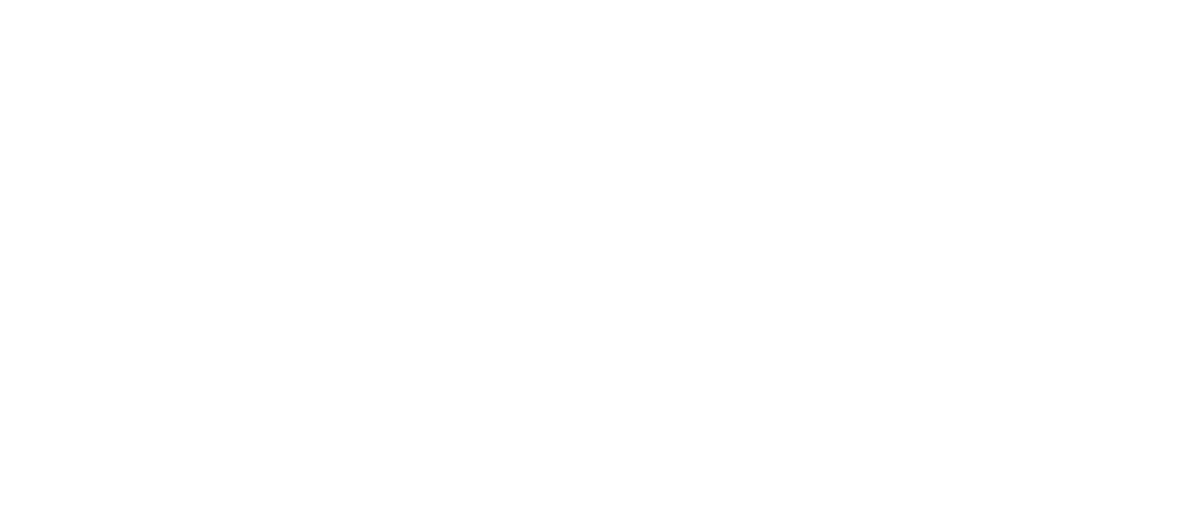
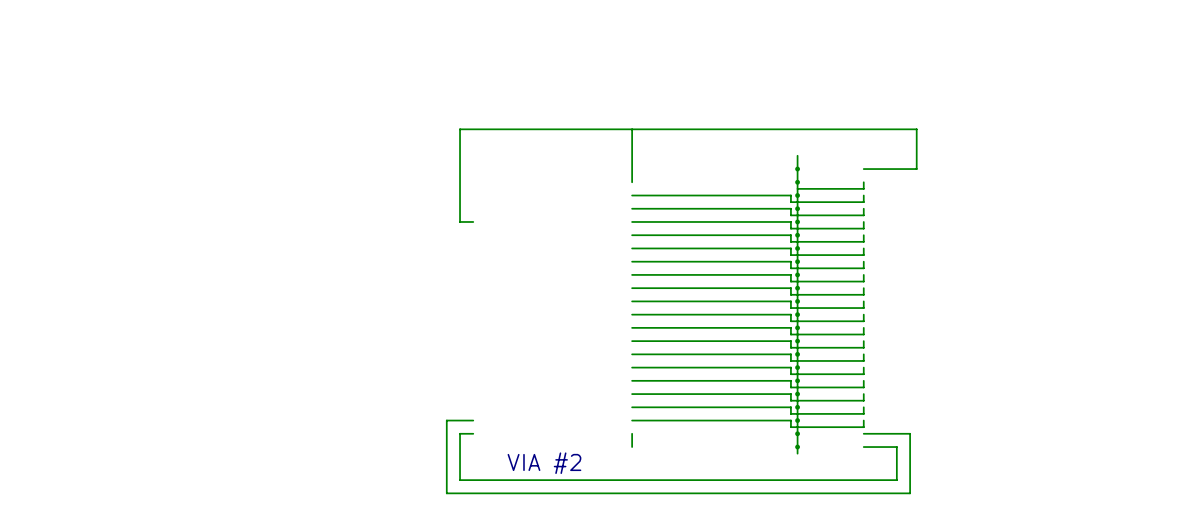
wire: none -> (632, 129) (632, 182)
wire: none -> (797, 155) (797, 453)
junction: none -> (797, 169)
wire: none -> (863, 169) (916, 169) (916, 129) (460, 129) (460, 221) (473, 221)
junction: none -> (797, 182)
wire: none -> (863, 182) (863, 188) (797, 188)
wire: none -> (632, 195) (790, 195) (790, 202) (863, 202) (863, 195)
junction: none -> (797, 195)
wire: none -> (632, 208) (790, 208) (790, 215) (863, 215) (863, 208)
junction: none -> (797, 208)
wire: none -> (632, 221) (790, 221) (790, 228) (863, 228) (863, 221)
junction: none -> (797, 221)
wire: none -> (632, 235) (790, 235) (790, 241) (863, 241) (863, 235)
junction: none -> (797, 235)
wire: none -> (632, 248) (790, 248) (790, 255) (863, 255) (863, 248)
junction: none -> (797, 248)
wire: none -> (632, 261) (790, 261) (790, 268) (863, 268) (863, 261)
junction: none -> (797, 261)
wire: none -> (632, 274) (790, 274) (790, 281) (863, 281) (863, 274)
junction: none -> (797, 274)
wire: none -> (632, 288) (790, 288) (790, 294) (863, 294) (863, 288)
junction: none -> (797, 288)
wire: none -> (632, 301) (790, 301) (790, 308) (863, 308) (863, 301)
junction: none -> (797, 301)
wire: none -> (632, 314) (790, 314) (790, 321) (863, 321) (863, 314)
junction: none -> (797, 314)
wire: none -> (632, 327) (790, 327) (790, 334) (863, 334) (863, 327)
junction: none -> (797, 327)
wire: none -> (632, 341) (790, 341) (790, 347) (863, 347) (863, 341)
junction: none -> (797, 341)
wire: none -> (632, 354) (790, 354) (790, 360) (863, 360) (863, 354)
junction: none -> (797, 354)
wire: none -> (632, 367) (790, 367) (790, 374) (863, 374) (863, 367)
junction: none -> (797, 367)
wire: none -> (632, 380) (790, 380) (790, 387) (863, 387) (863, 380)
junction: none -> (797, 380)
wire: none -> (632, 394) (790, 394) (790, 400) (863, 400) (863, 394)
junction: none -> (797, 394)
wire: none -> (632, 407) (790, 407) (790, 413) (863, 413) (863, 407)
junction: none -> (797, 407)
wire: none -> (473, 420) (446, 420) (446, 493) (910, 493) (910, 433) (863, 433)
wire: none -> (632, 420) (790, 420) (790, 427) (863, 427) (863, 420)
junction: none -> (797, 420)
wire: none -> (473, 433) (460, 433) (460, 480) (896, 480) (896, 447) (863, 447)
wire: none -> (632, 433) (632, 447)
junction: none -> (797, 433)
junction: none -> (797, 447)
text: none -> VIA #2 (544, 463)

